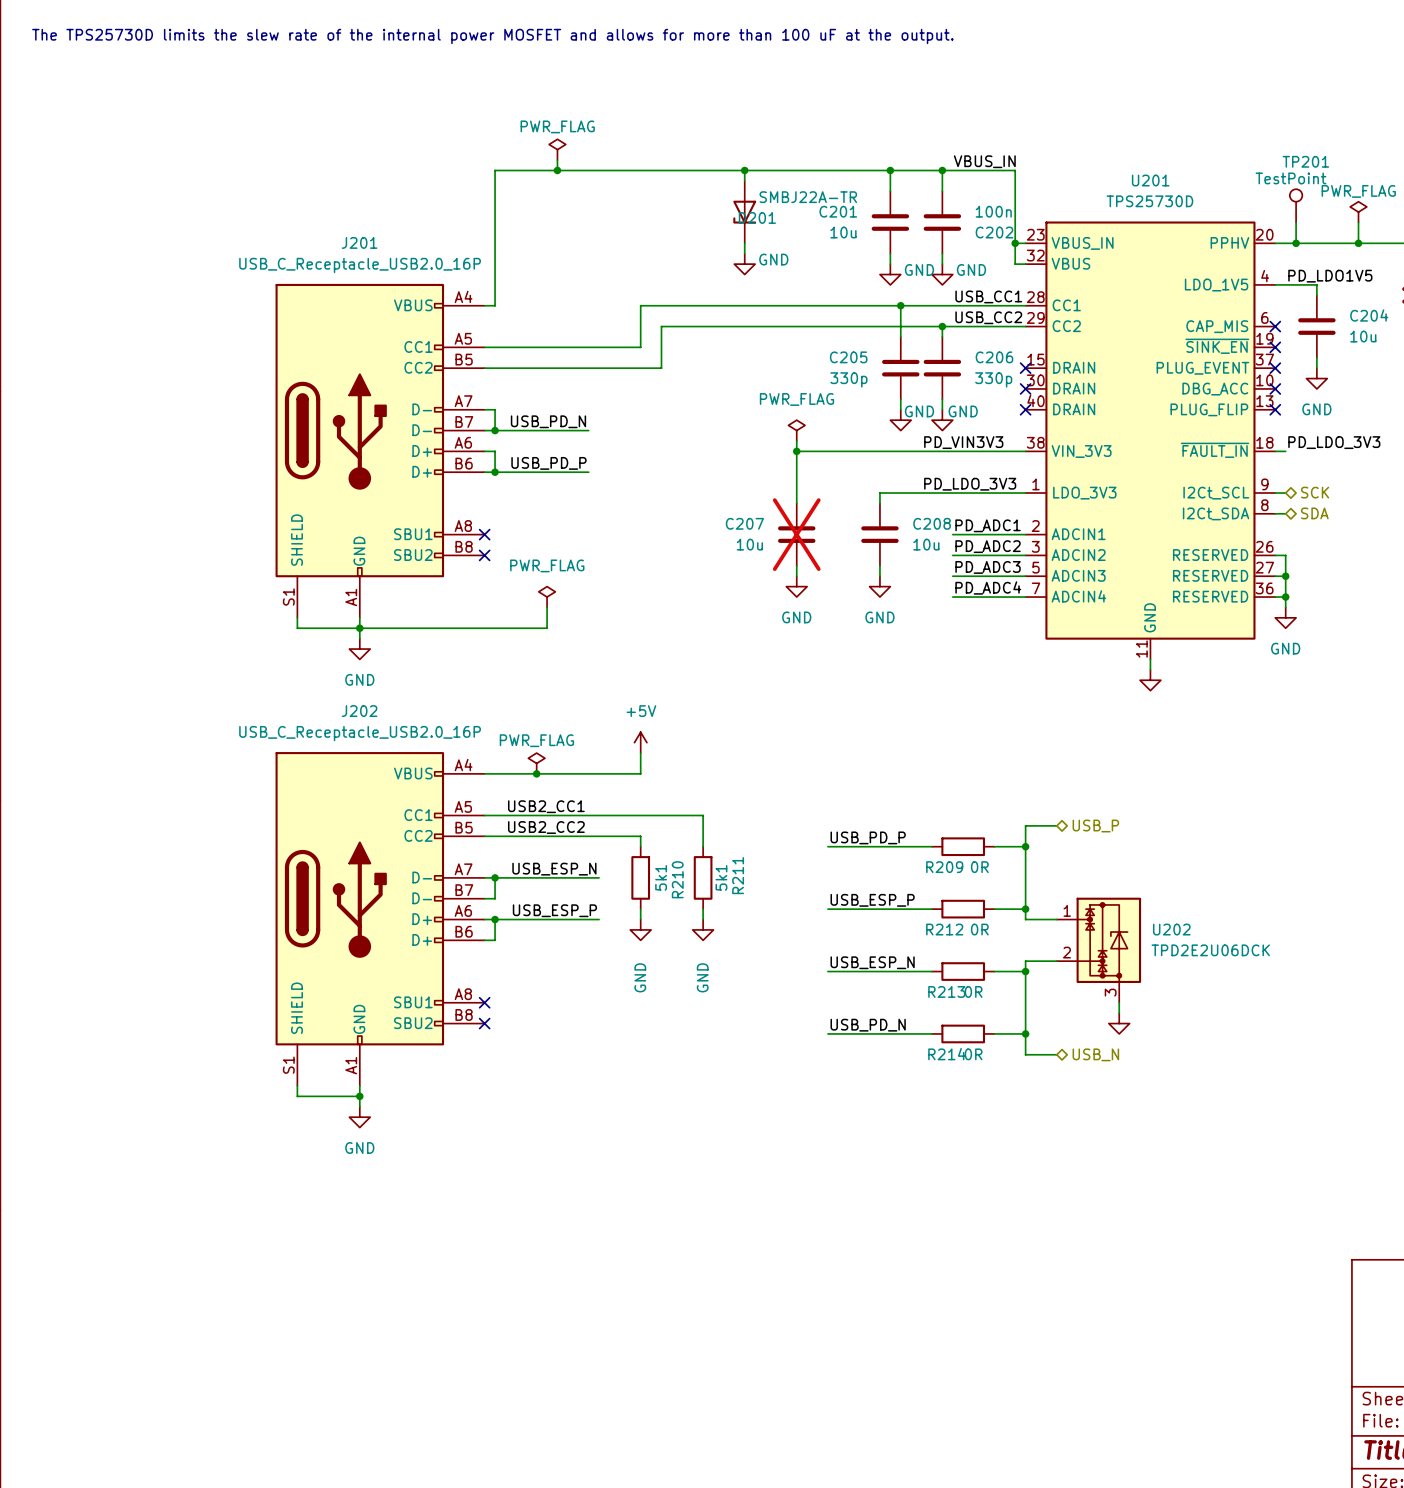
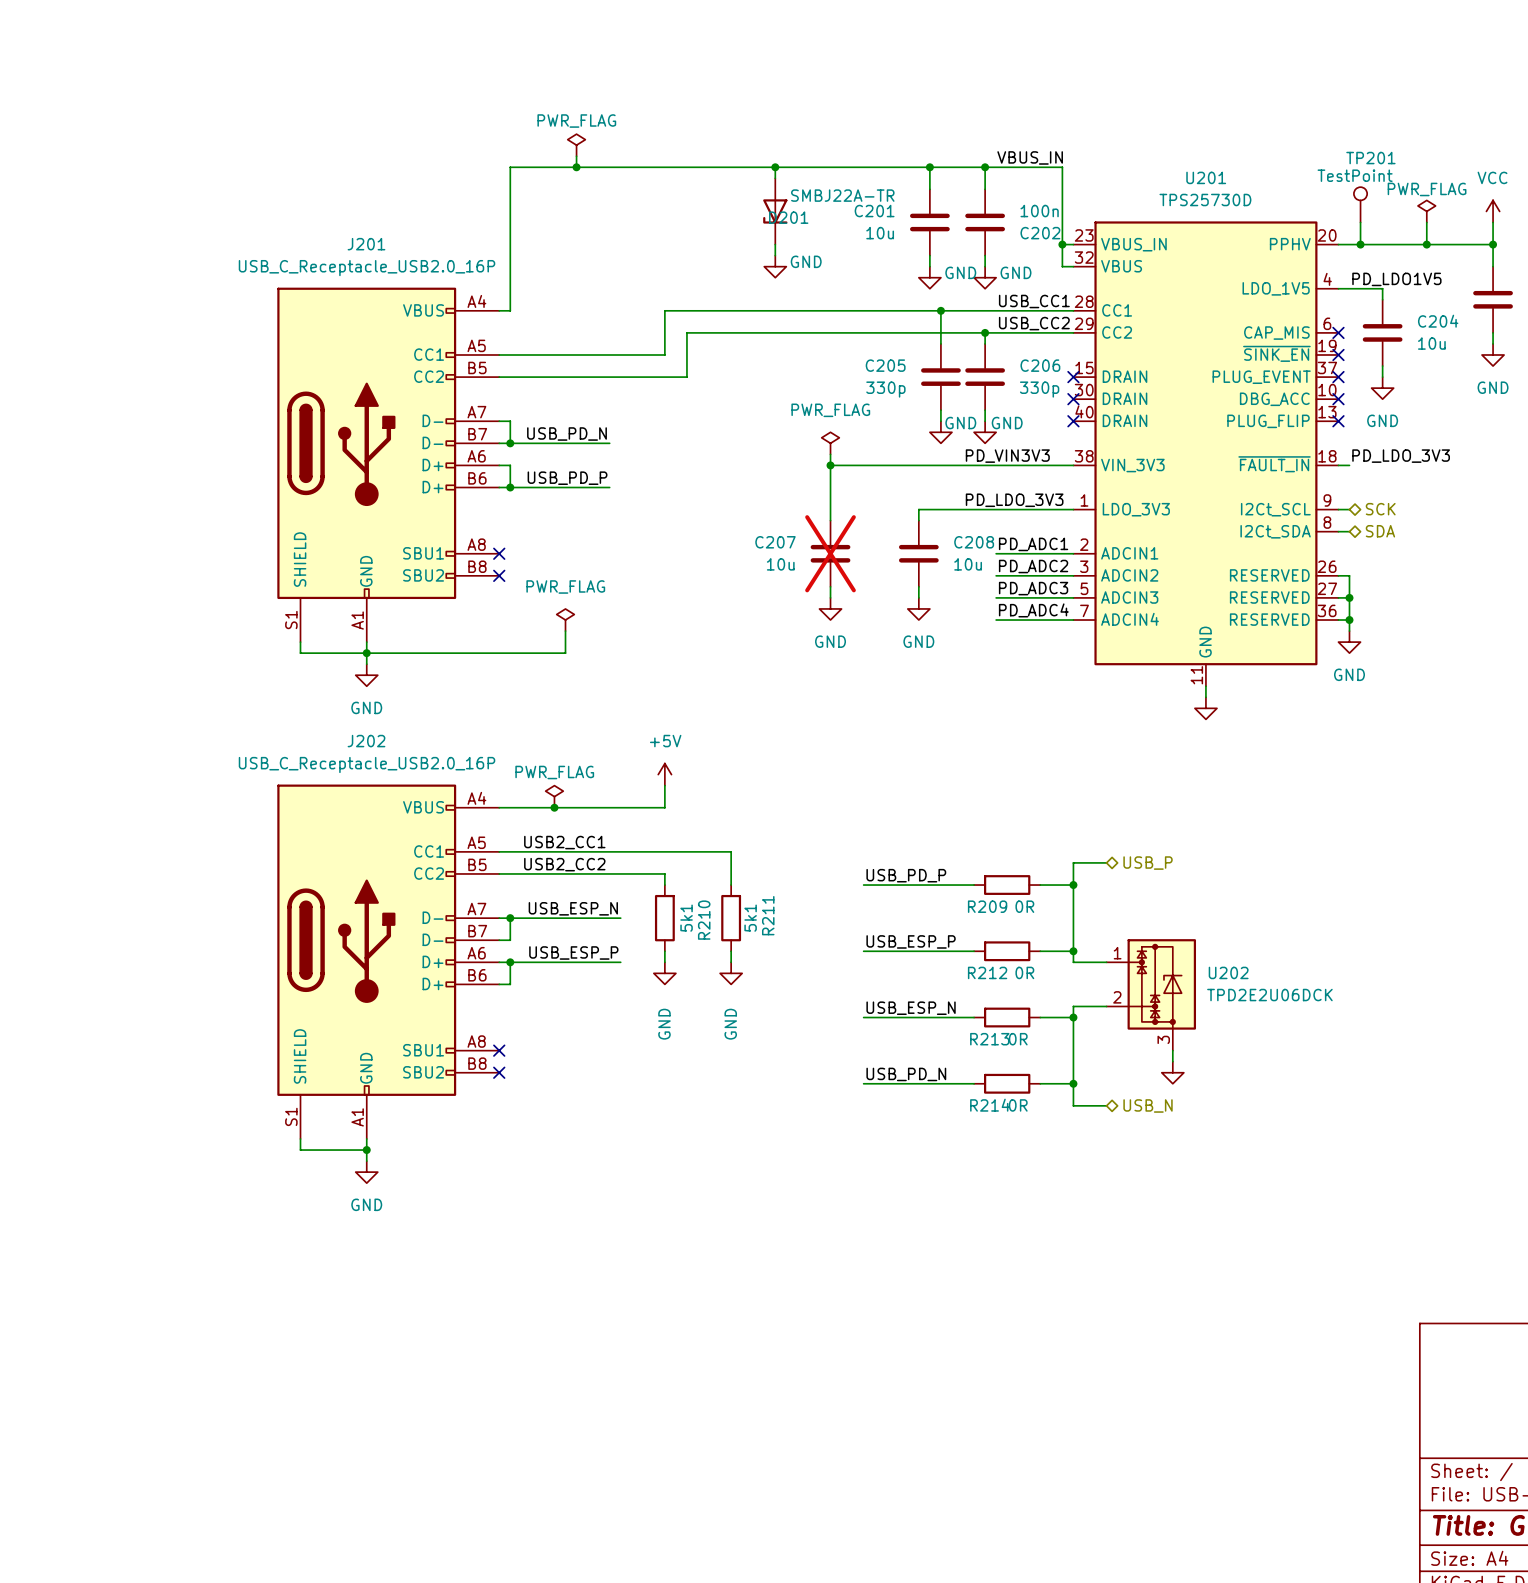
text: The TPS25730D limits the slew rate of the internal power MOSFET and allows for more than 100 uF at the output. (492, 36) -> none

